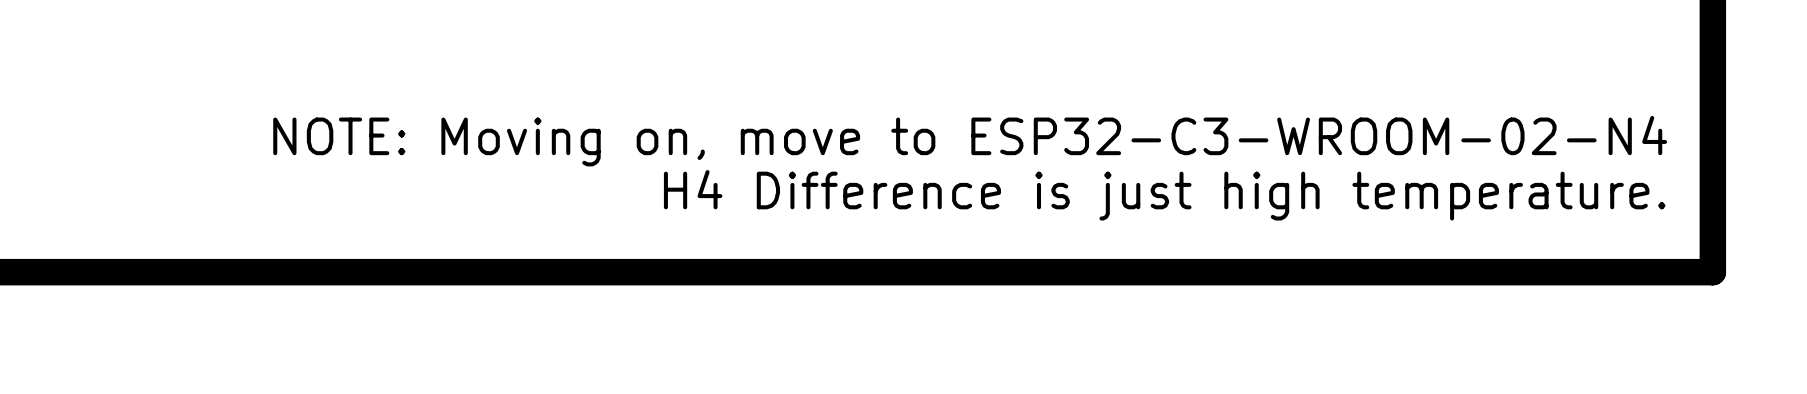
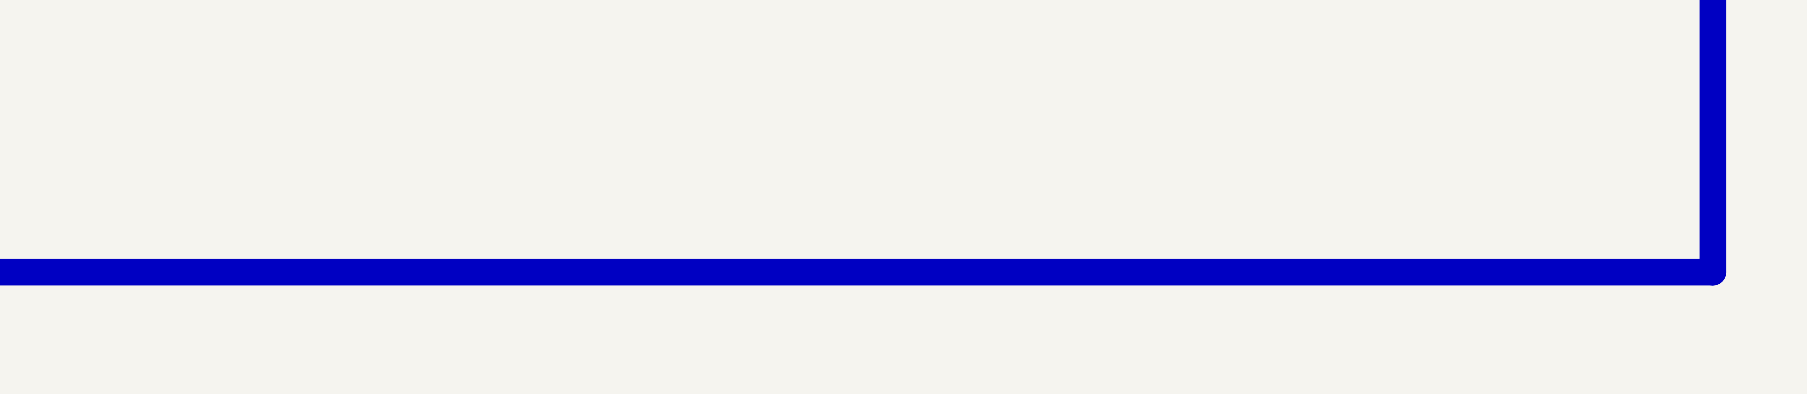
text: NOTE: Moving on, move to ESP32-C3-WROOM-02-N4 (970, 141) -> none
text: H4 Difference is just high temperature. (1164, 195) -> none

